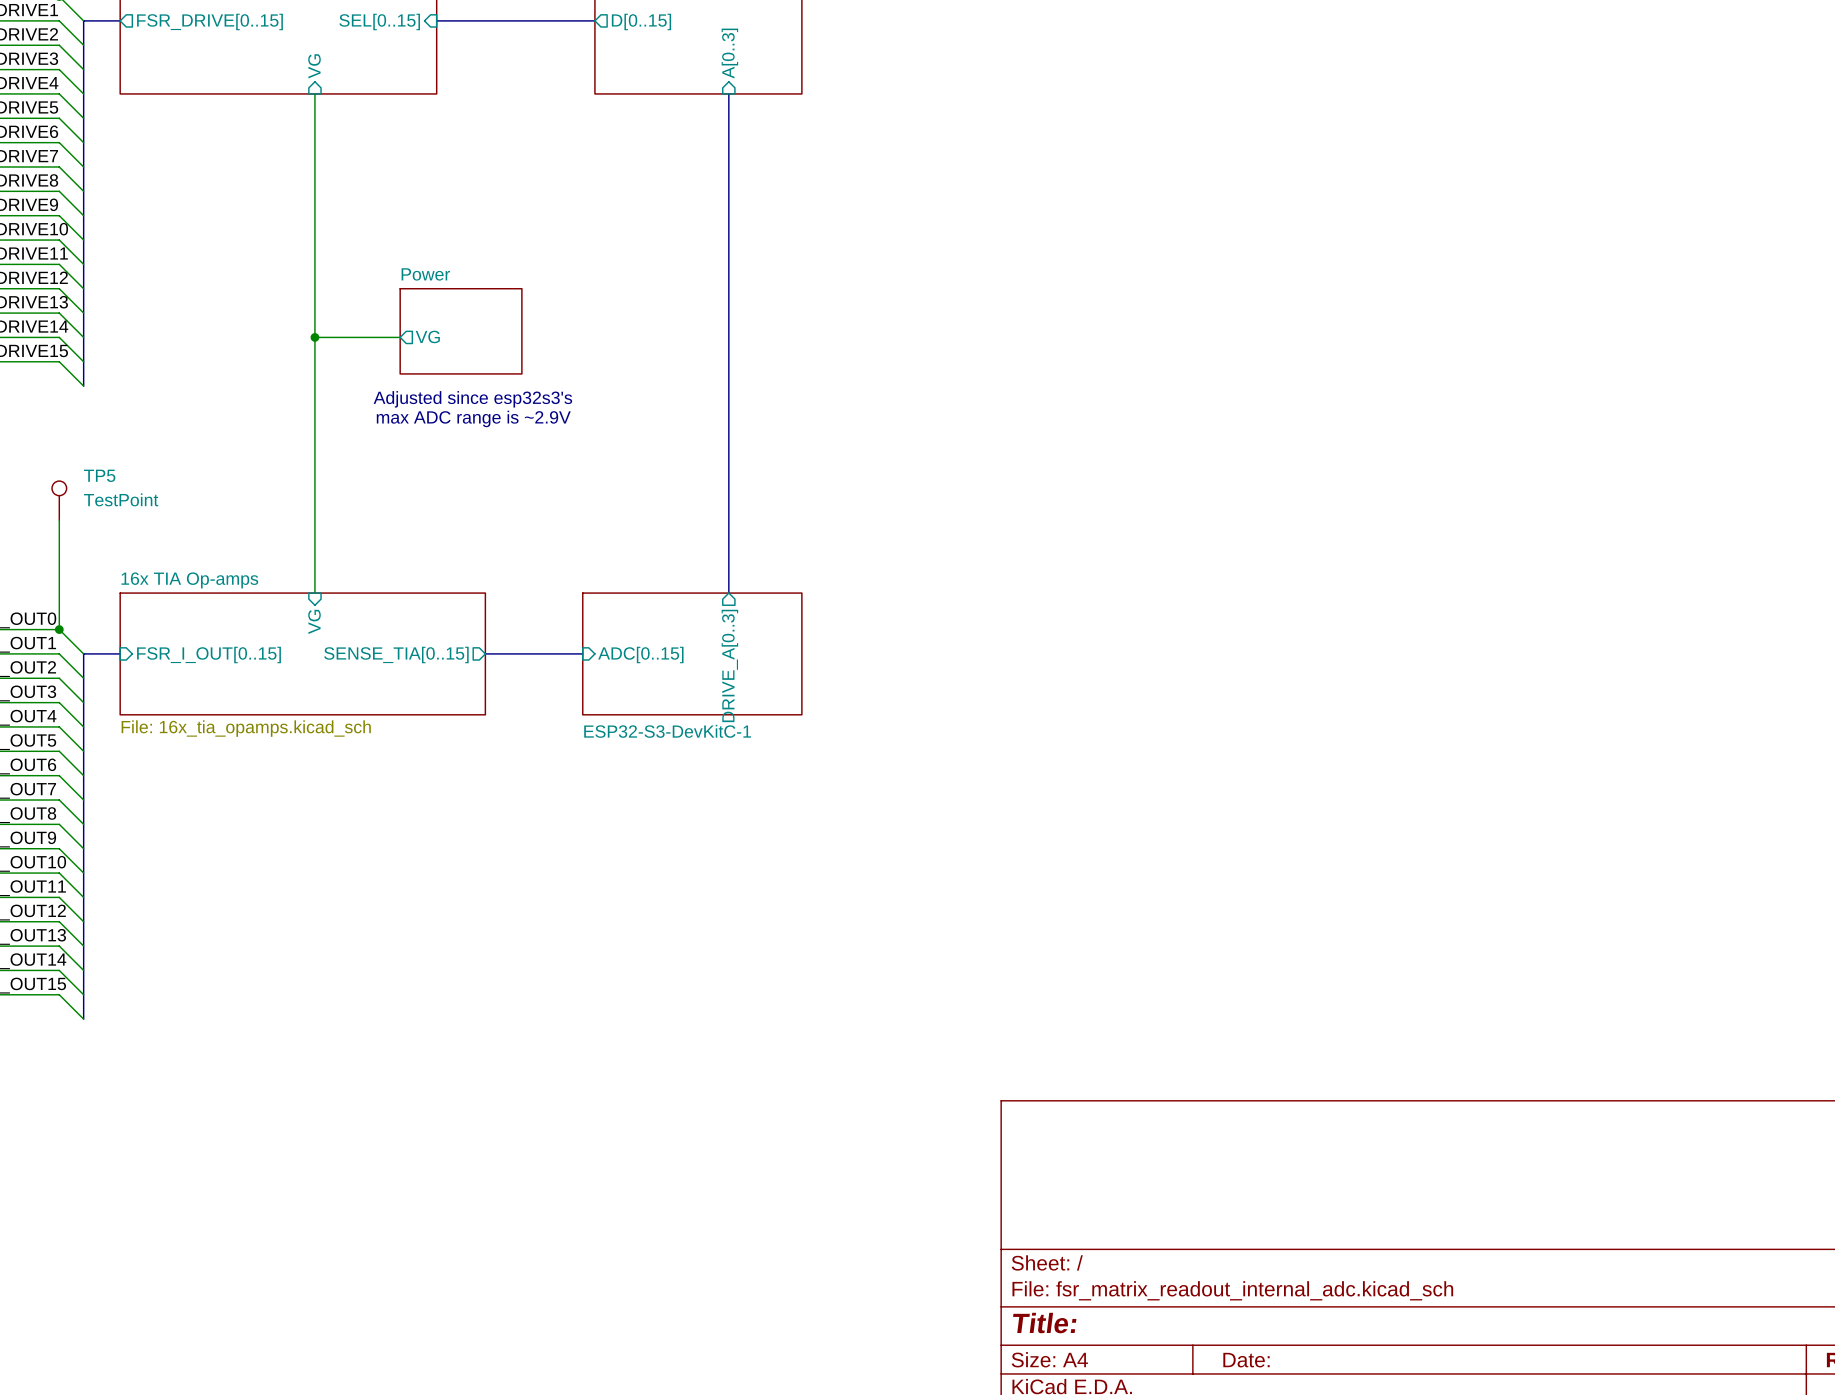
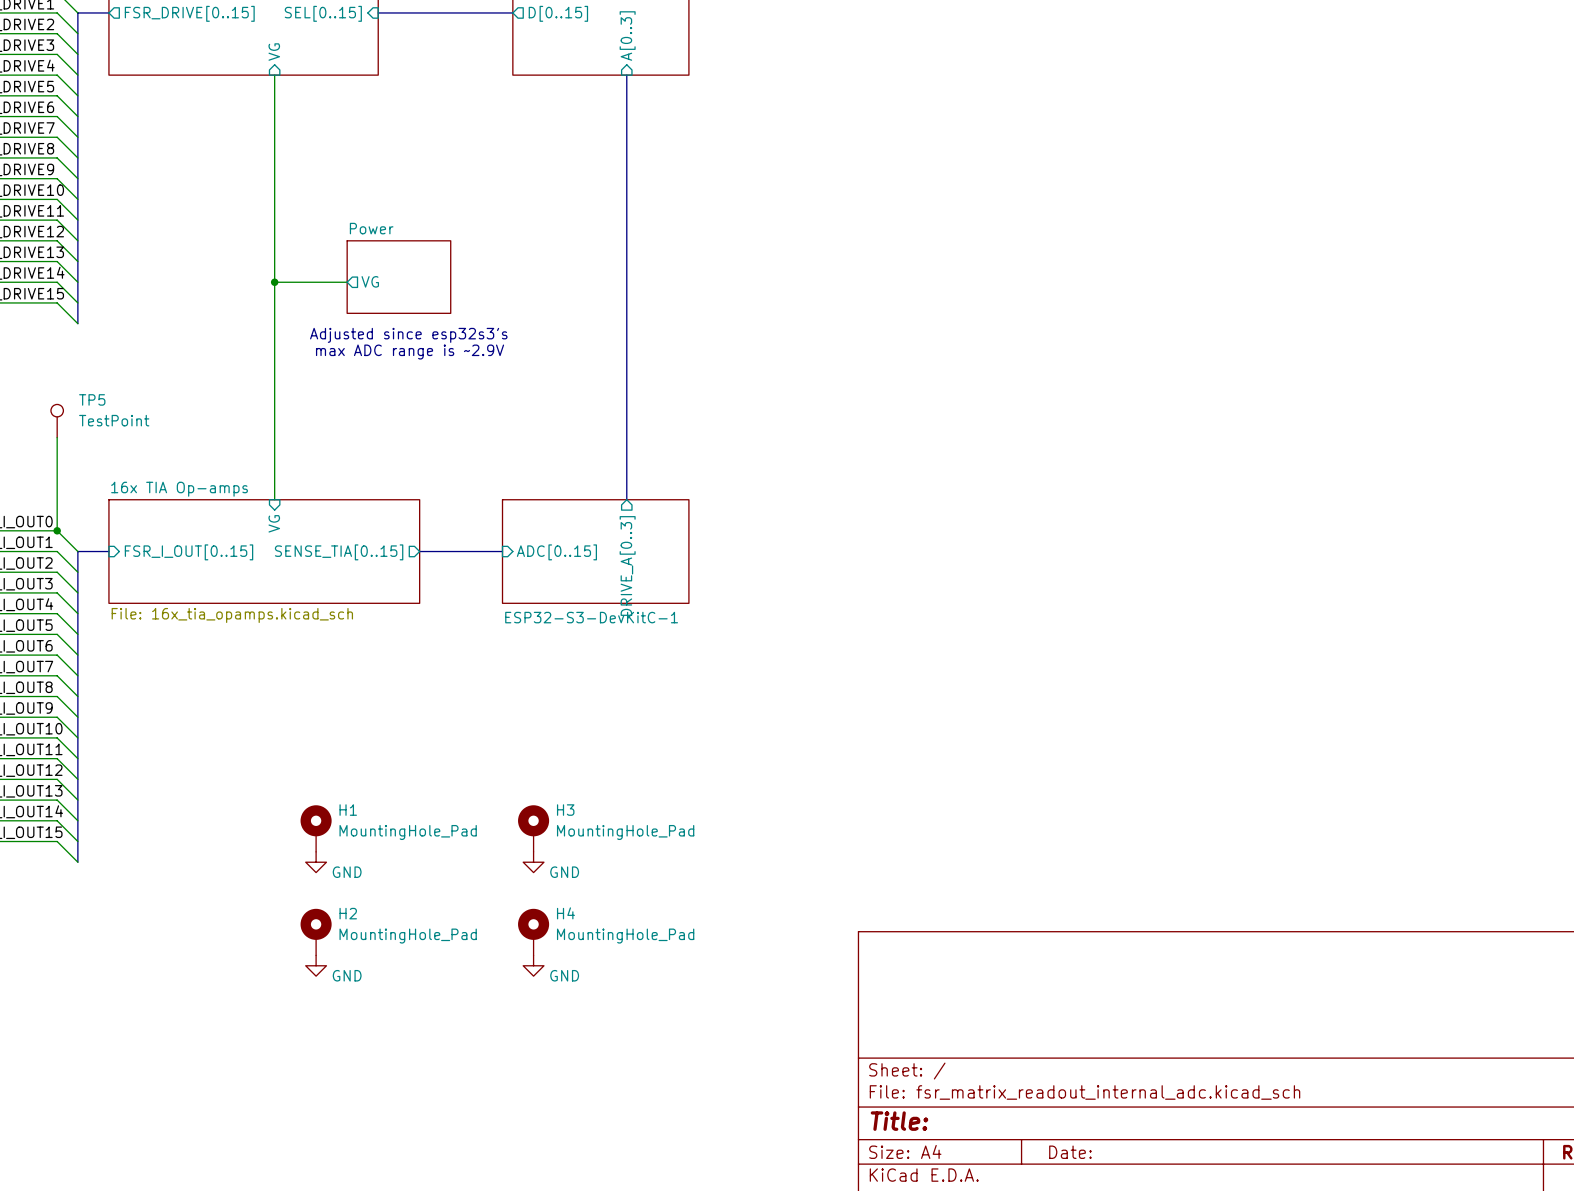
H1: none -> MountingHole_Pad (316, 828)
H3: none -> MountingHole_Pad (533, 828)
power symbol: none -> GND (316, 862)
power symbol: none -> GND (533, 862)
H2: none -> MountingHole_Pad (316, 932)
H4: none -> MountingHole_Pad (533, 932)
power symbol: none -> GND (316, 965)
power symbol: none -> GND (533, 965)

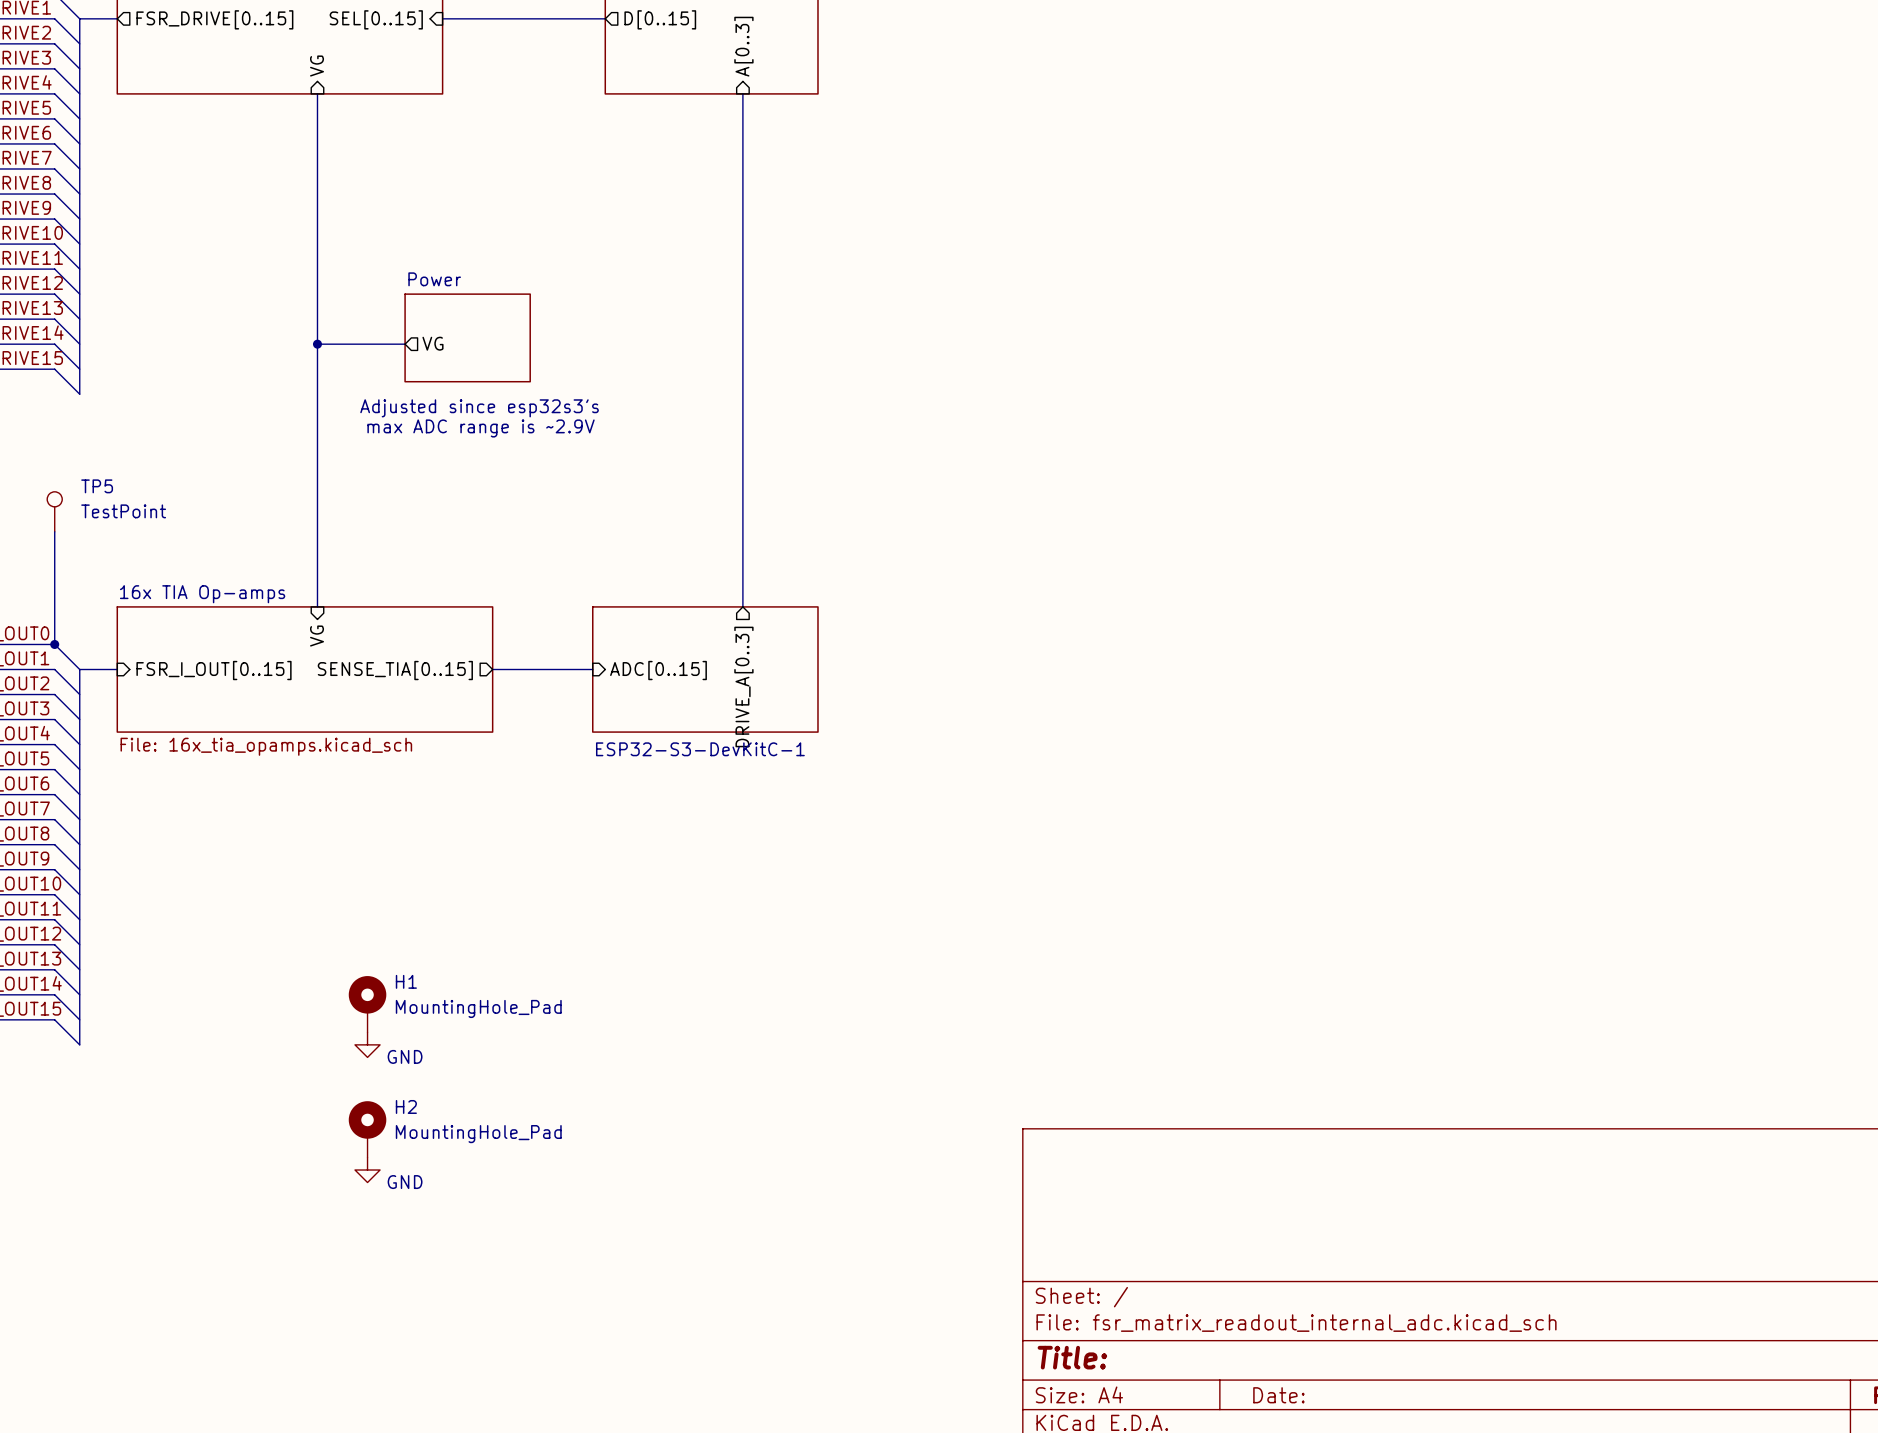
H3: MountingHole_Pad (533, 828) -> none
power symbol: GND (533, 862) -> none
H4: MountingHole_Pad (533, 932) -> none
power symbol: GND (533, 965) -> none

